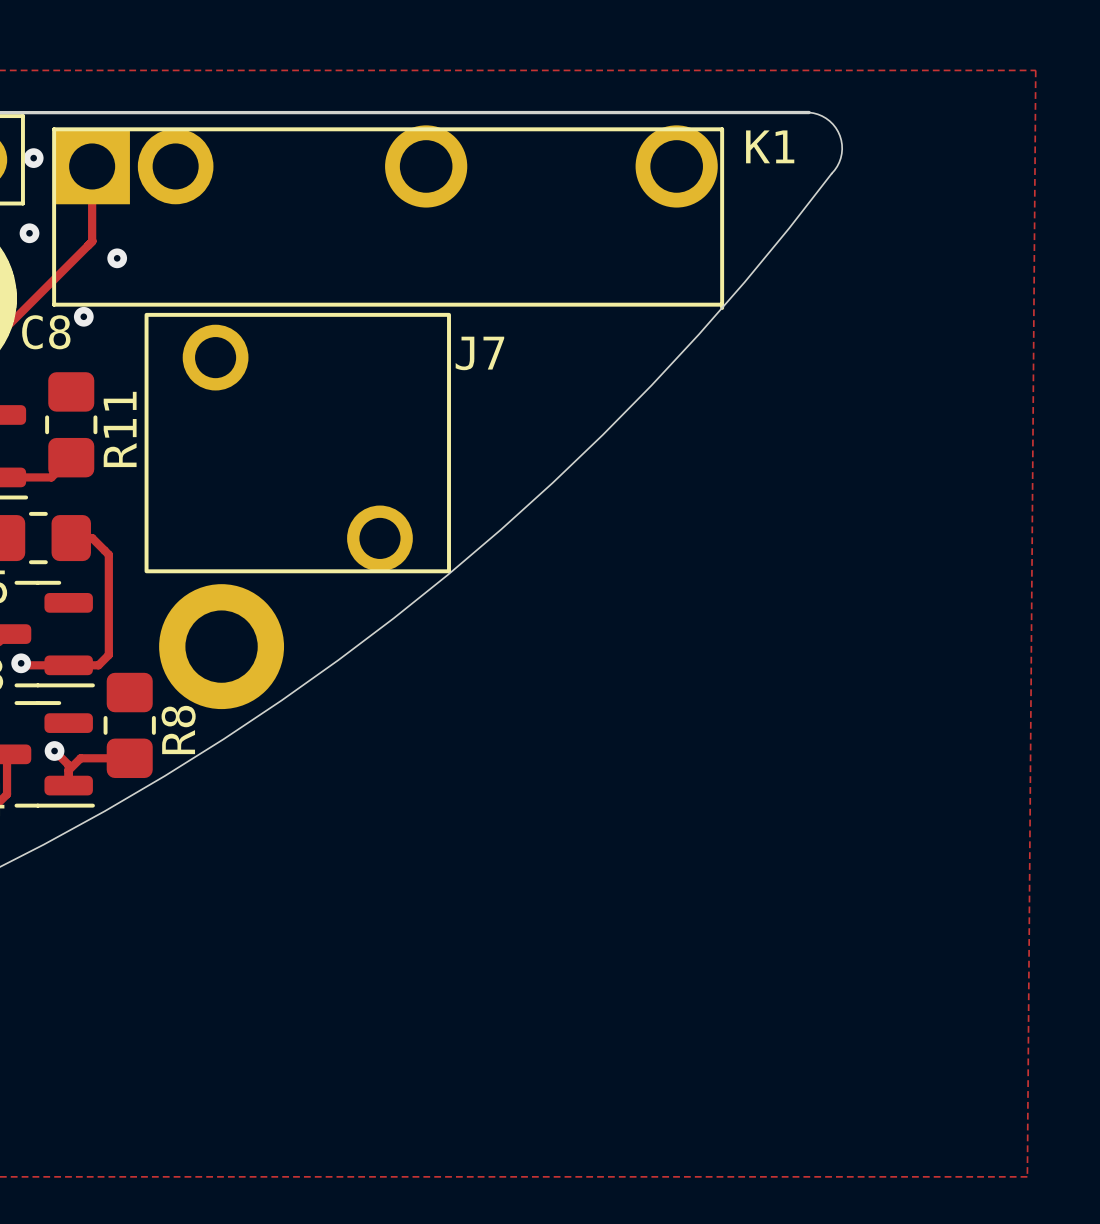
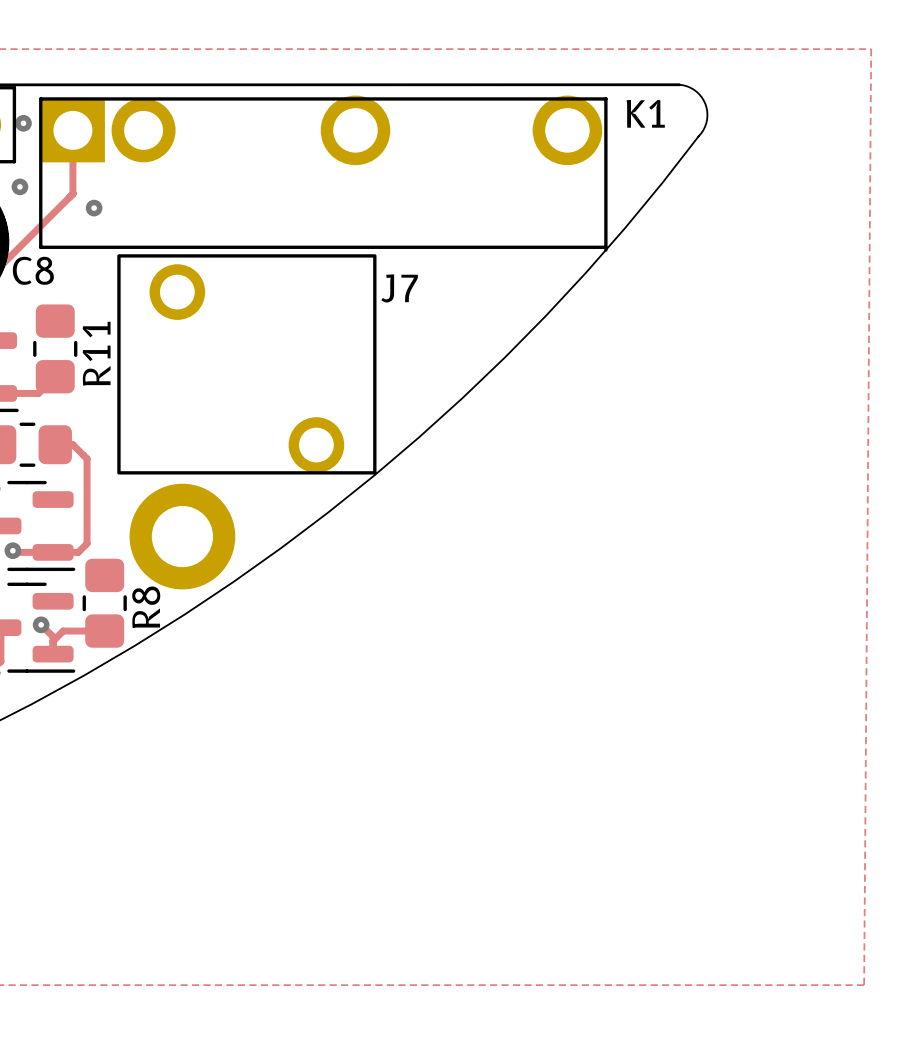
via: (83, 316) -> none

